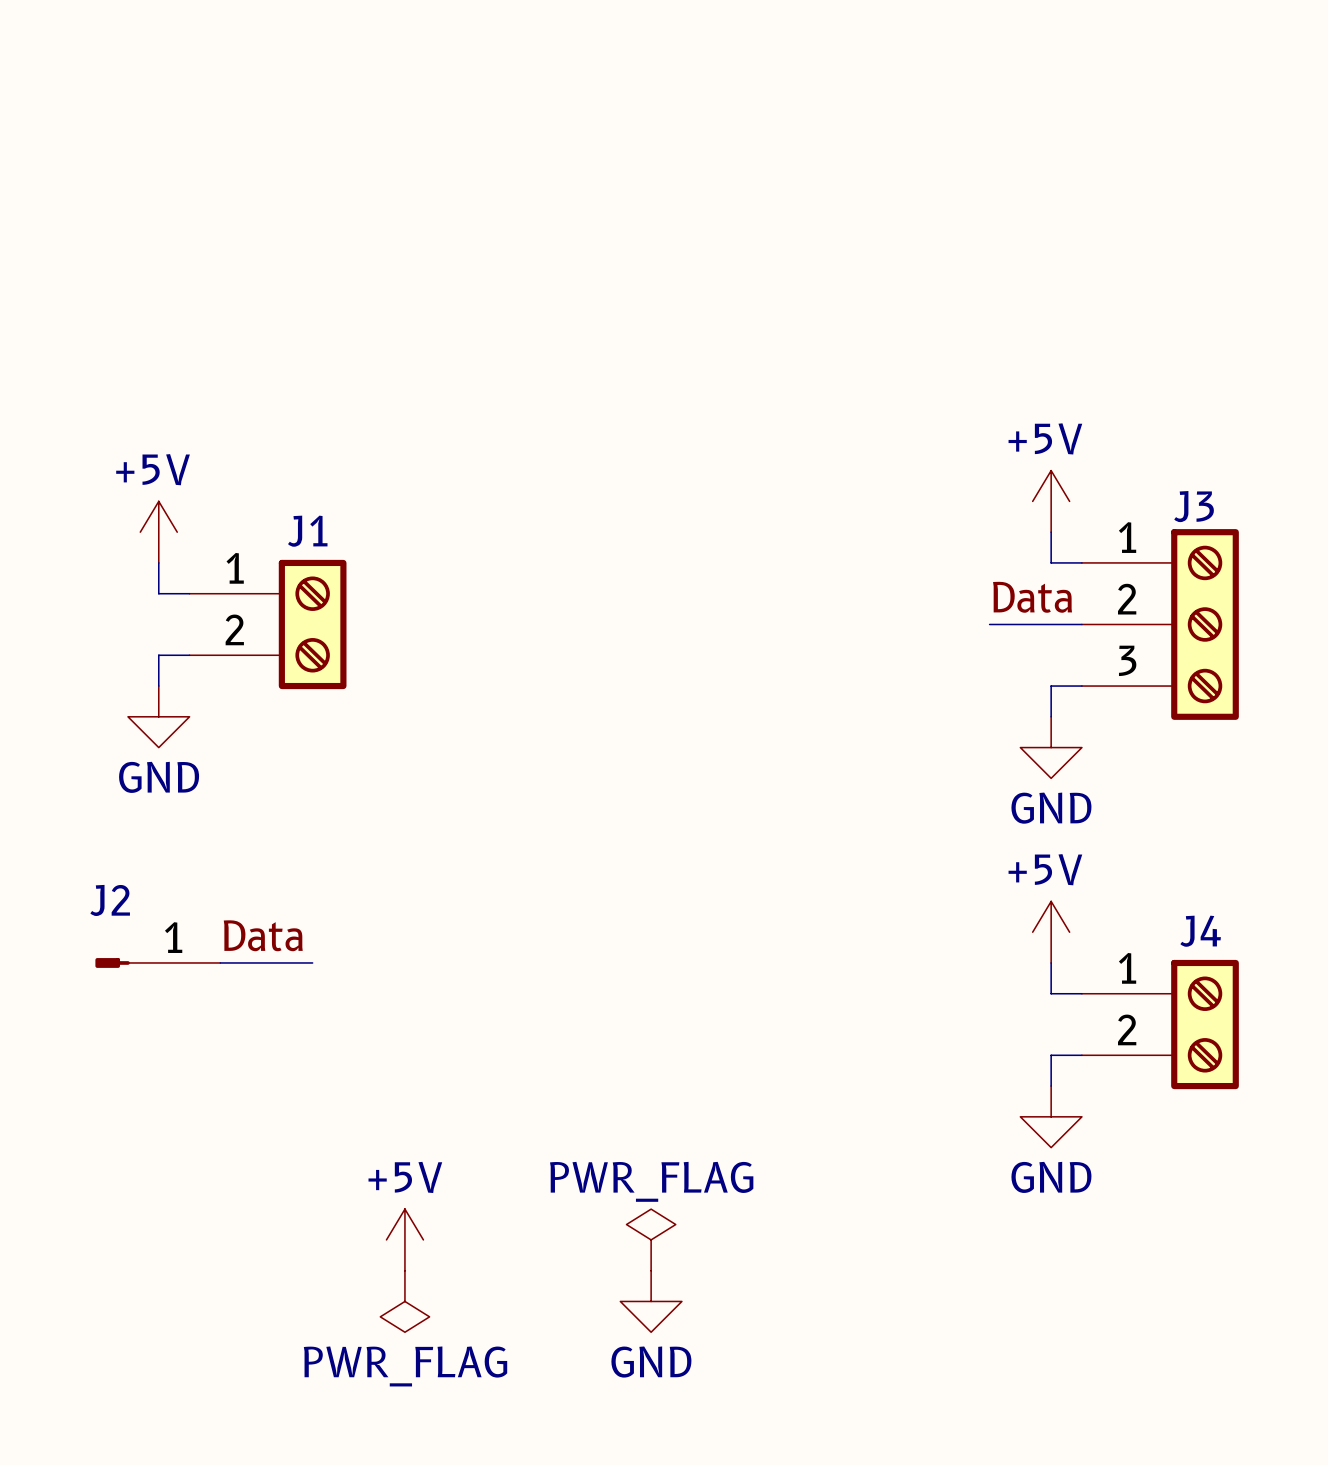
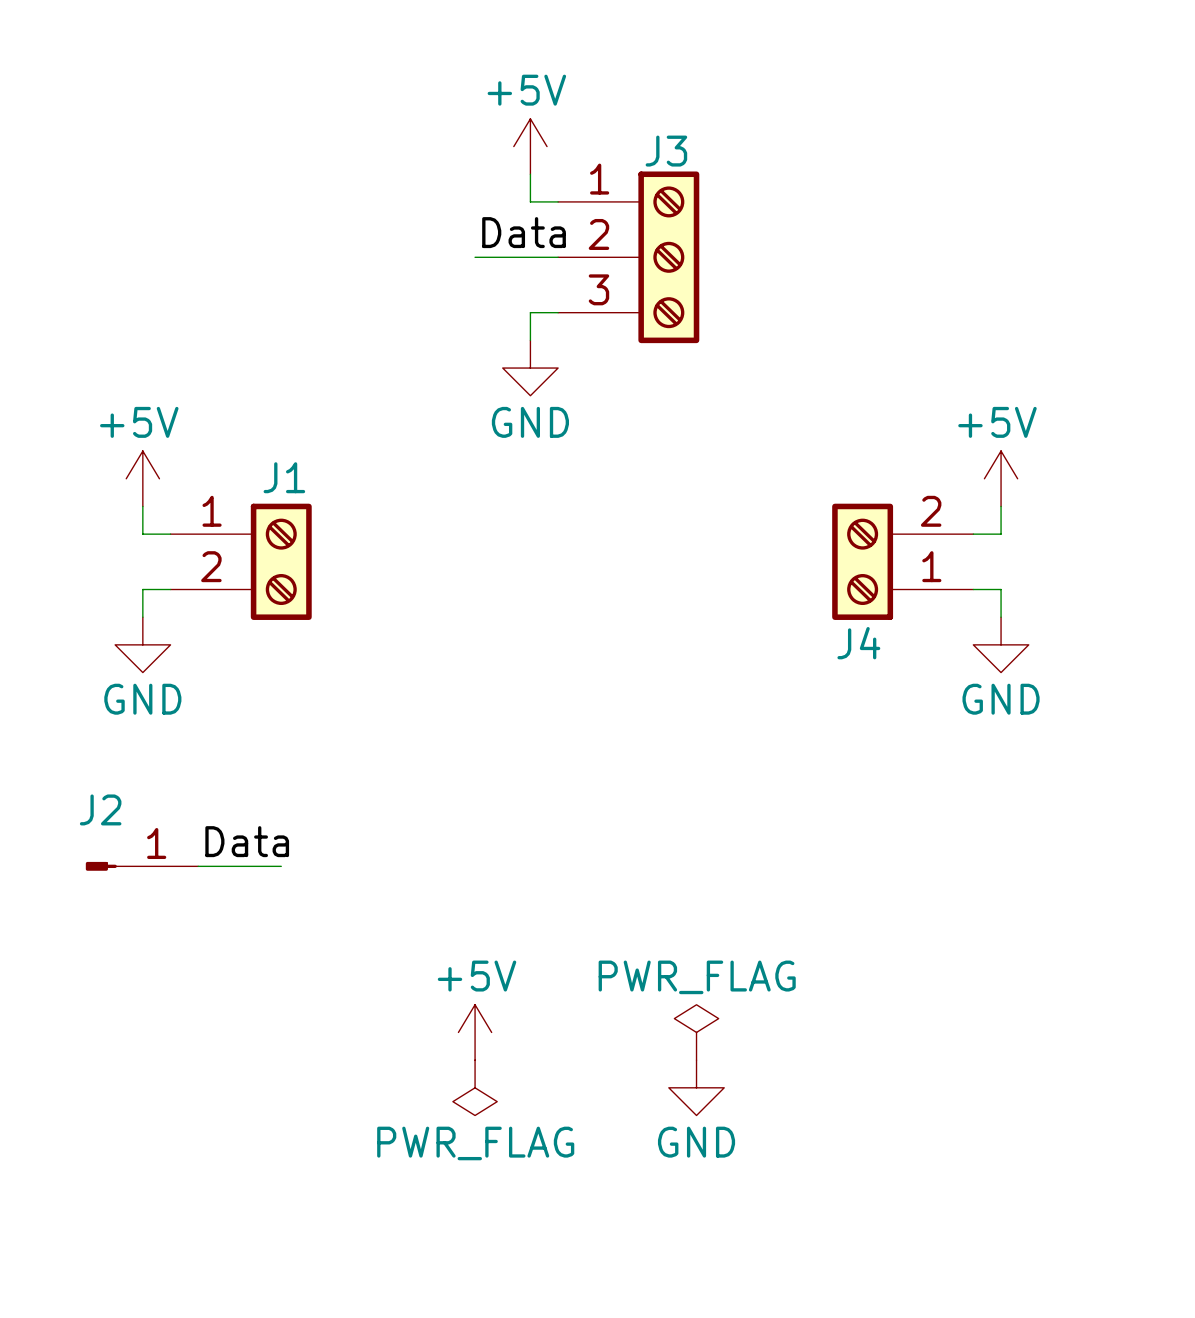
power symbol: none -> +5V (530, 146)
power symbol: none -> GND (530, 368)
power symbol position: +5V (1051, 501) -> +5V (1001, 478)
wire: (1051, 532) (1051, 562) (1081, 562) -> (530, 174) (530, 201) (558, 201)
wire: none -> (1001, 506) (1001, 534) (973, 534)
label position: Data (1032, 597) -> Data (524, 232)
wire: (989, 624) (1081, 624) -> (475, 257) (558, 257)
J3 position: (1160, 624) -> (628, 257)
wire: none -> (973, 589) (1001, 589) (1001, 617)
wire: (1081, 686) (1051, 686) (1051, 716) -> (558, 312) (530, 312) (530, 340)
power symbol position: GND (1051, 747) -> GND (1001, 644)
power symbol: +5V (1051, 932) -> none
wire: (1051, 962) (1051, 993) (1081, 993) -> none
J4 position: (1160, 1024) -> (902, 561)
J4 rotation: 0° (1205, 1024) -> 180° (862, 561)
wire: (1081, 1055) (1051, 1055) (1051, 1086) -> none
power symbol: GND (1051, 1116) -> none
power symbol: none -> PWR_FLAG (696, 1032)
power symbol: none -> PWR_FLAG (475, 1087)
power symbol: none -> GND (696, 1087)
power symbol position: +5V (404, 1239) -> +5V (475, 1032)
power symbol: PWR_FLAG (651, 1239) -> none
power symbol: PWR_FLAG (404, 1301) -> none
power symbol: GND (651, 1301) -> none

